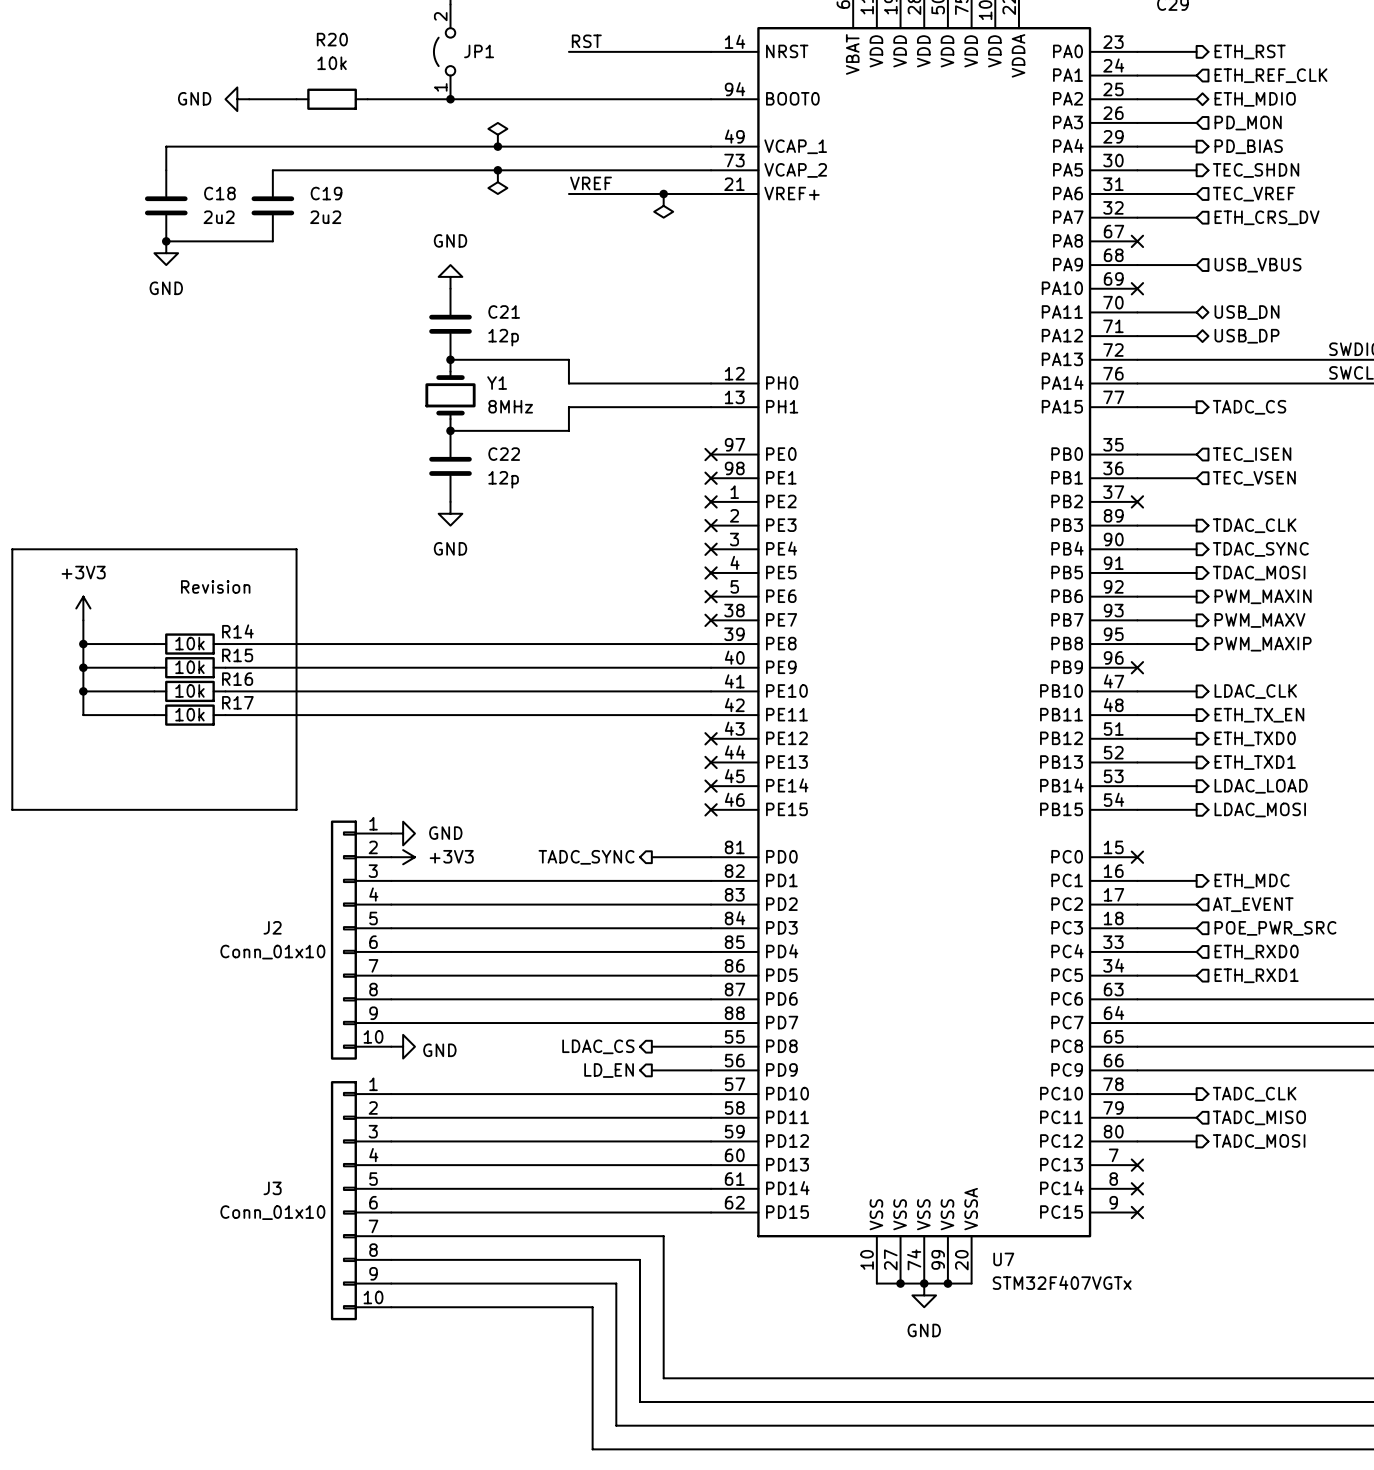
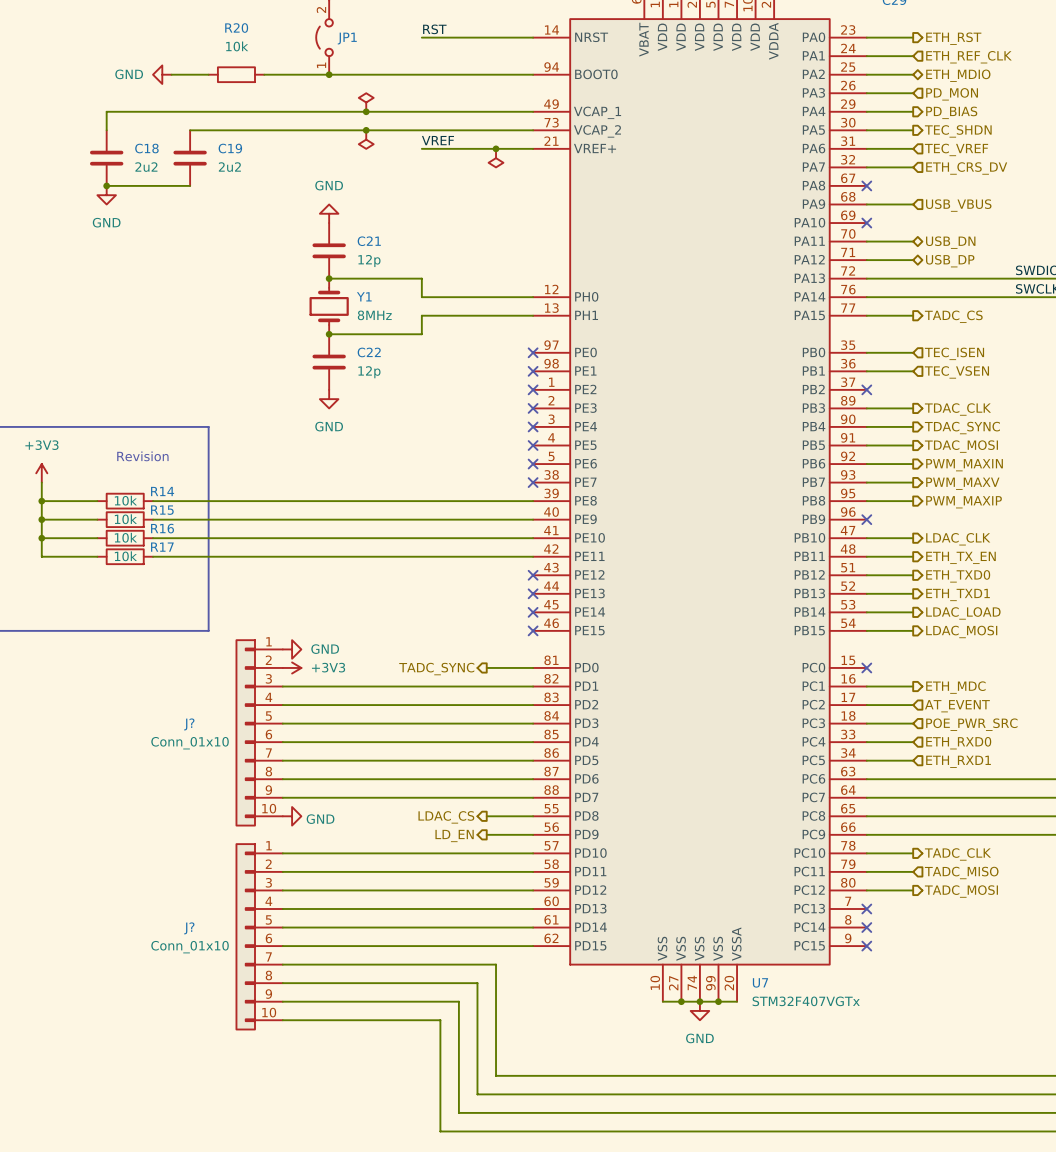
J2 name: J2 (272, 927) -> J? (189, 724)
J3 name: J3 (272, 1188) -> J? (189, 928)

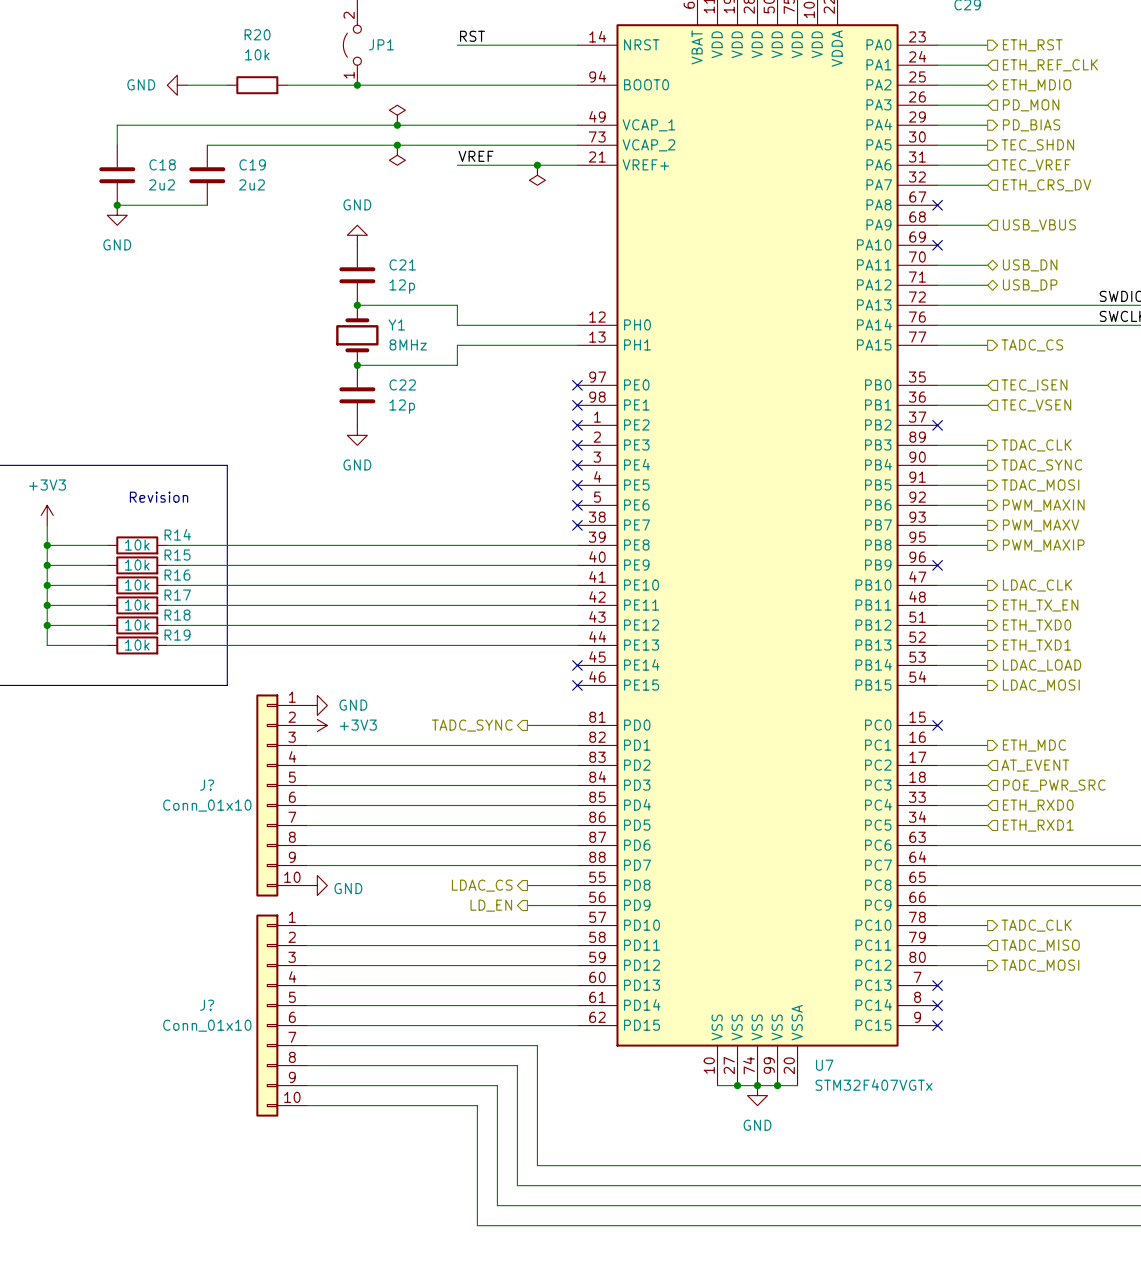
wire: none -> (47, 605) (47, 645) (107, 645)
junction: none -> (47, 605)
wire: none -> (47, 625) (107, 625)
junction: none -> (47, 625)
R18: none -> 10k (137, 625)
wire: none -> (167, 625) (577, 625)
no-connect mark: (533, 575) -> none
R19: none -> 10k (137, 645)
wire: none -> (167, 645) (577, 645)
no-connect mark: (533, 593) -> none

